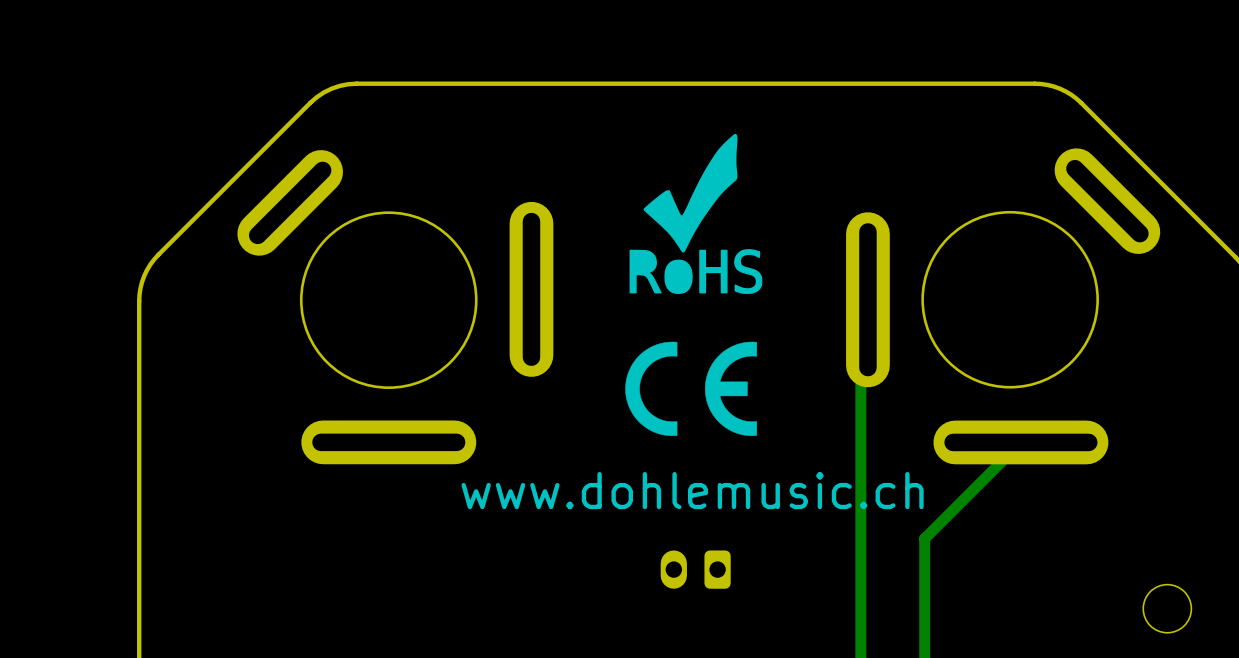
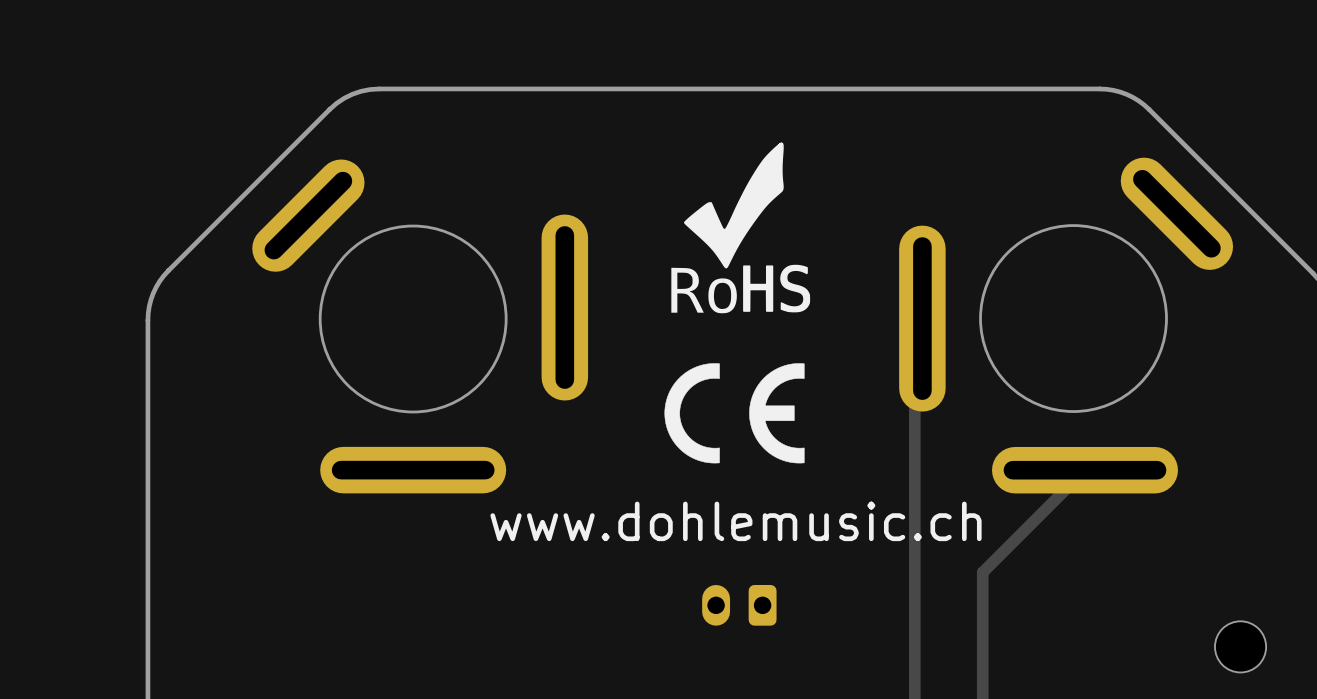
drawing shape: [629, 249, 662, 294] -> [671, 267, 704, 313]
drawing: [635, 254, 693, 294] -> none
drawing: none -> [708, 278, 737, 314]

